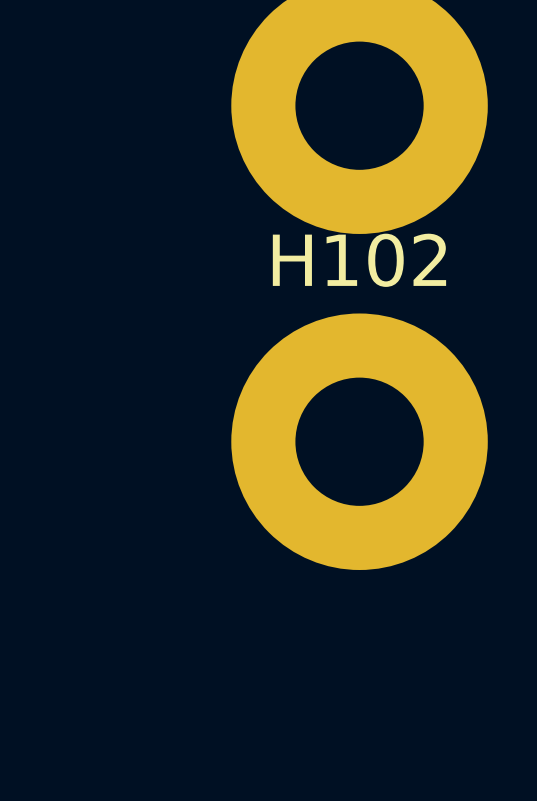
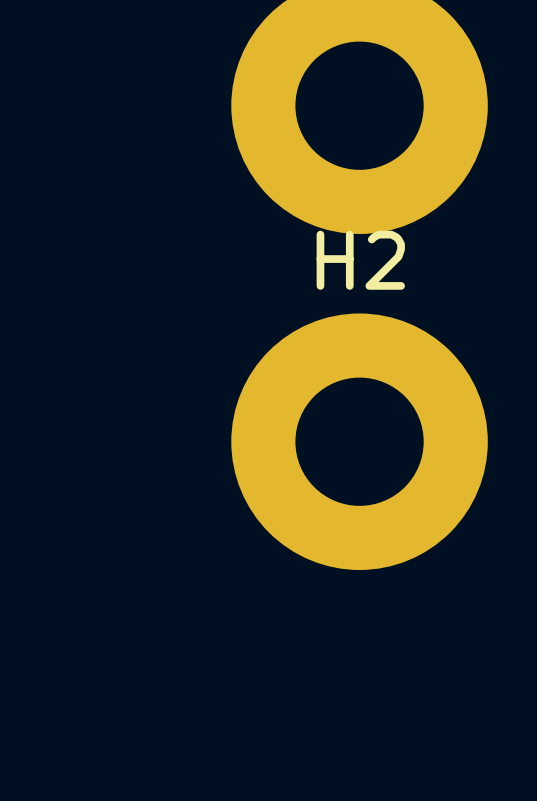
H102 name: H102 (359, 260) -> H2 (360, 260)

